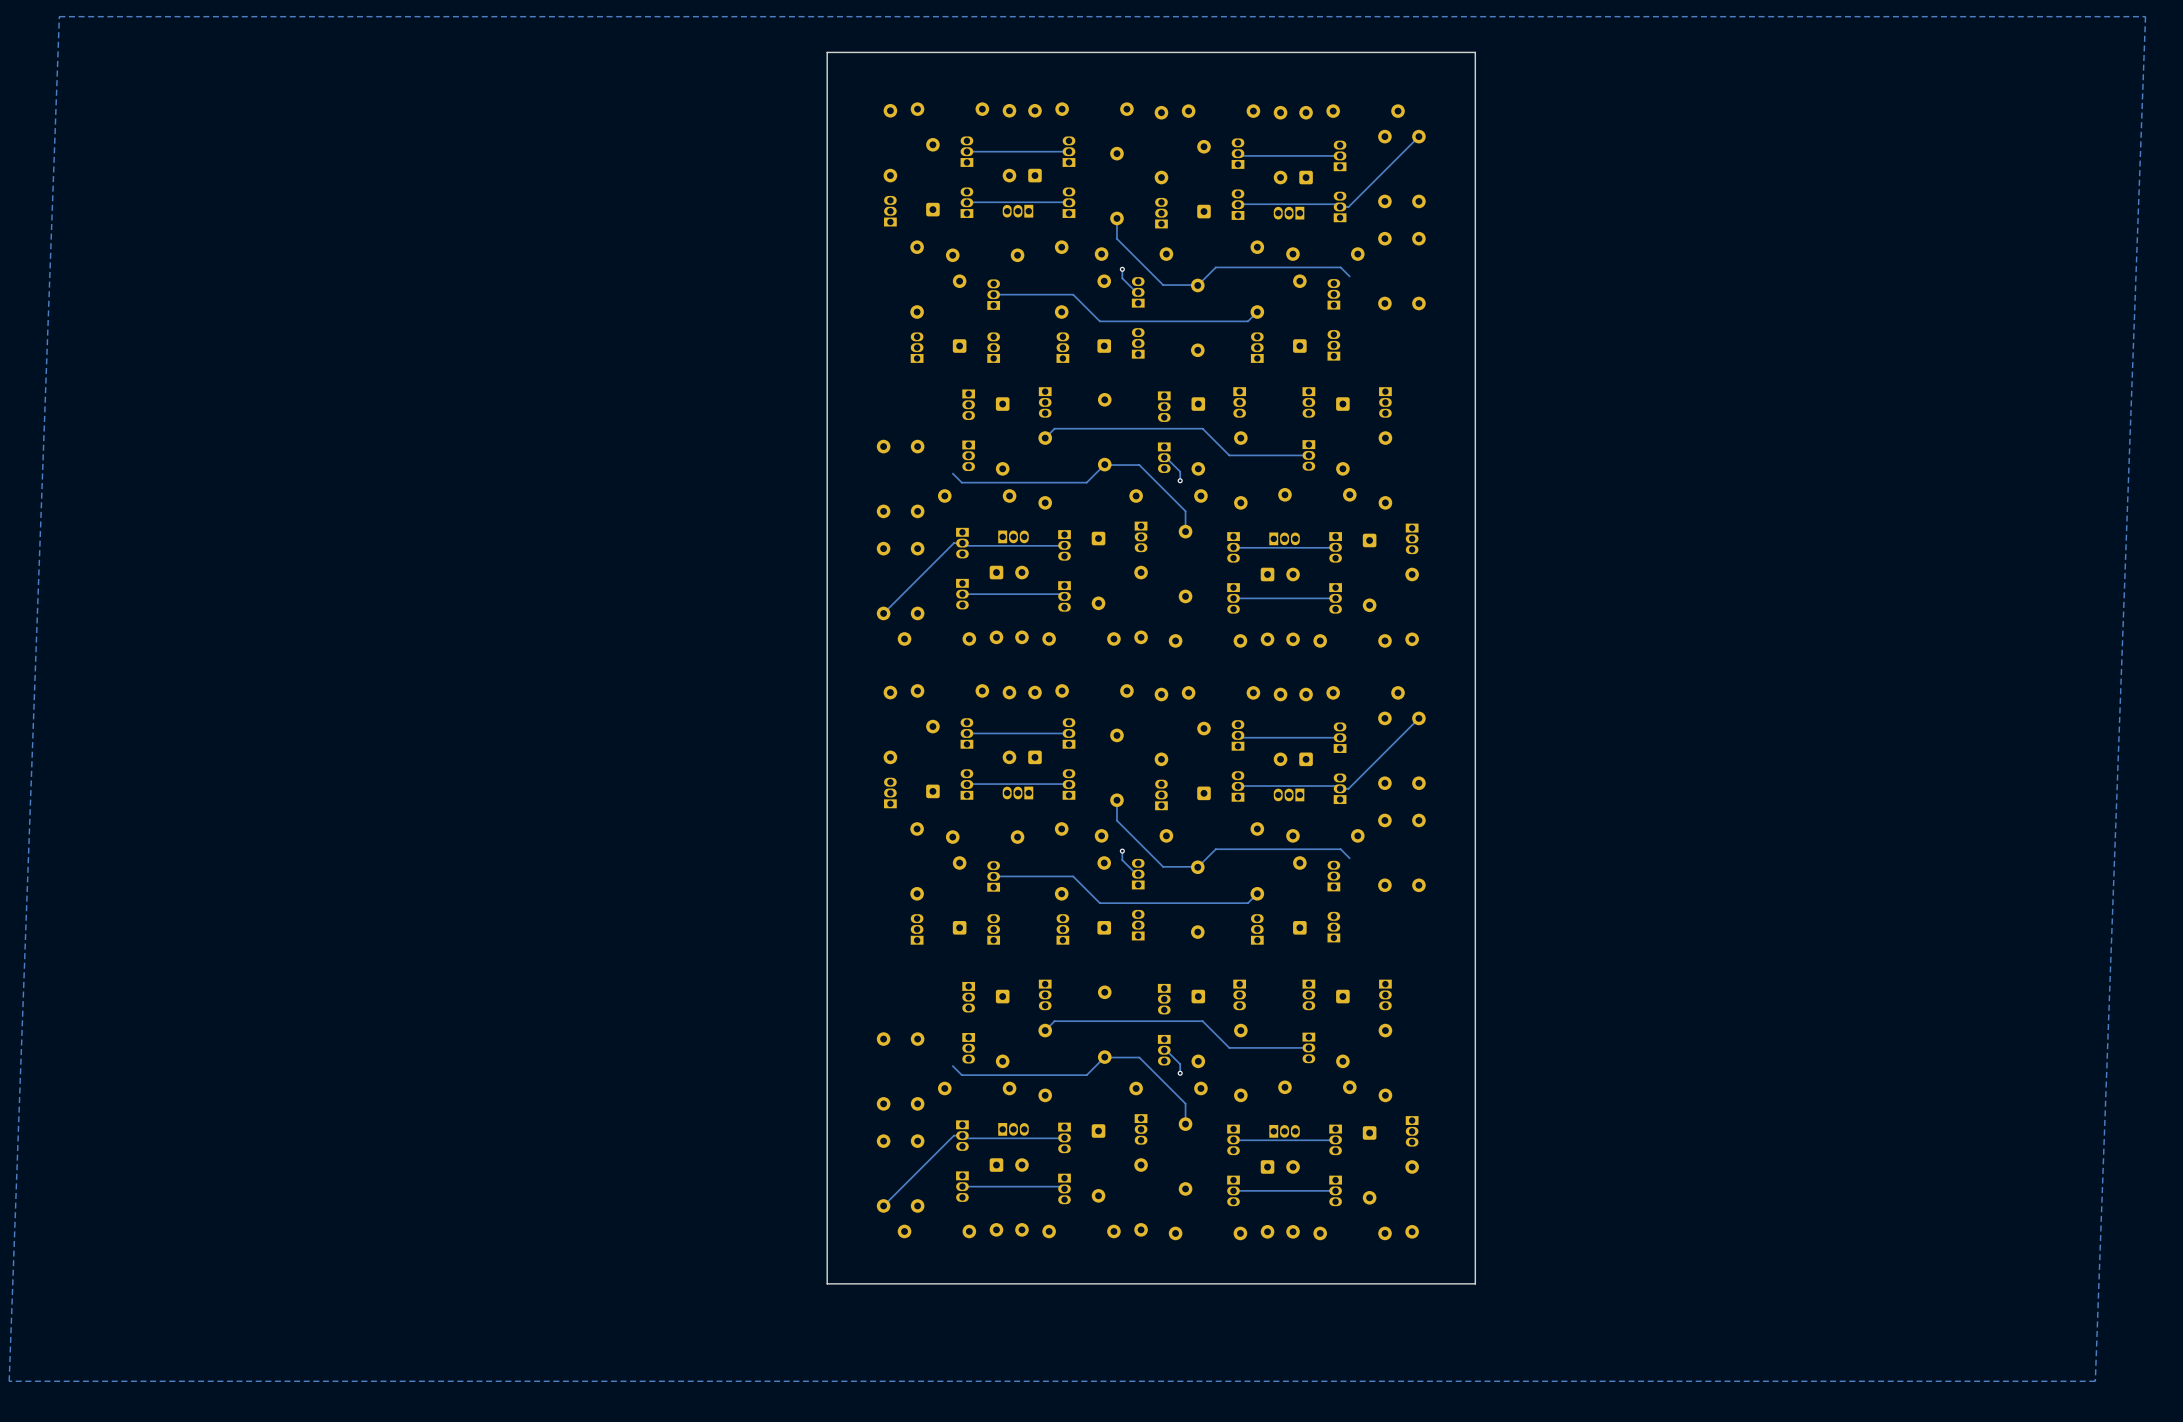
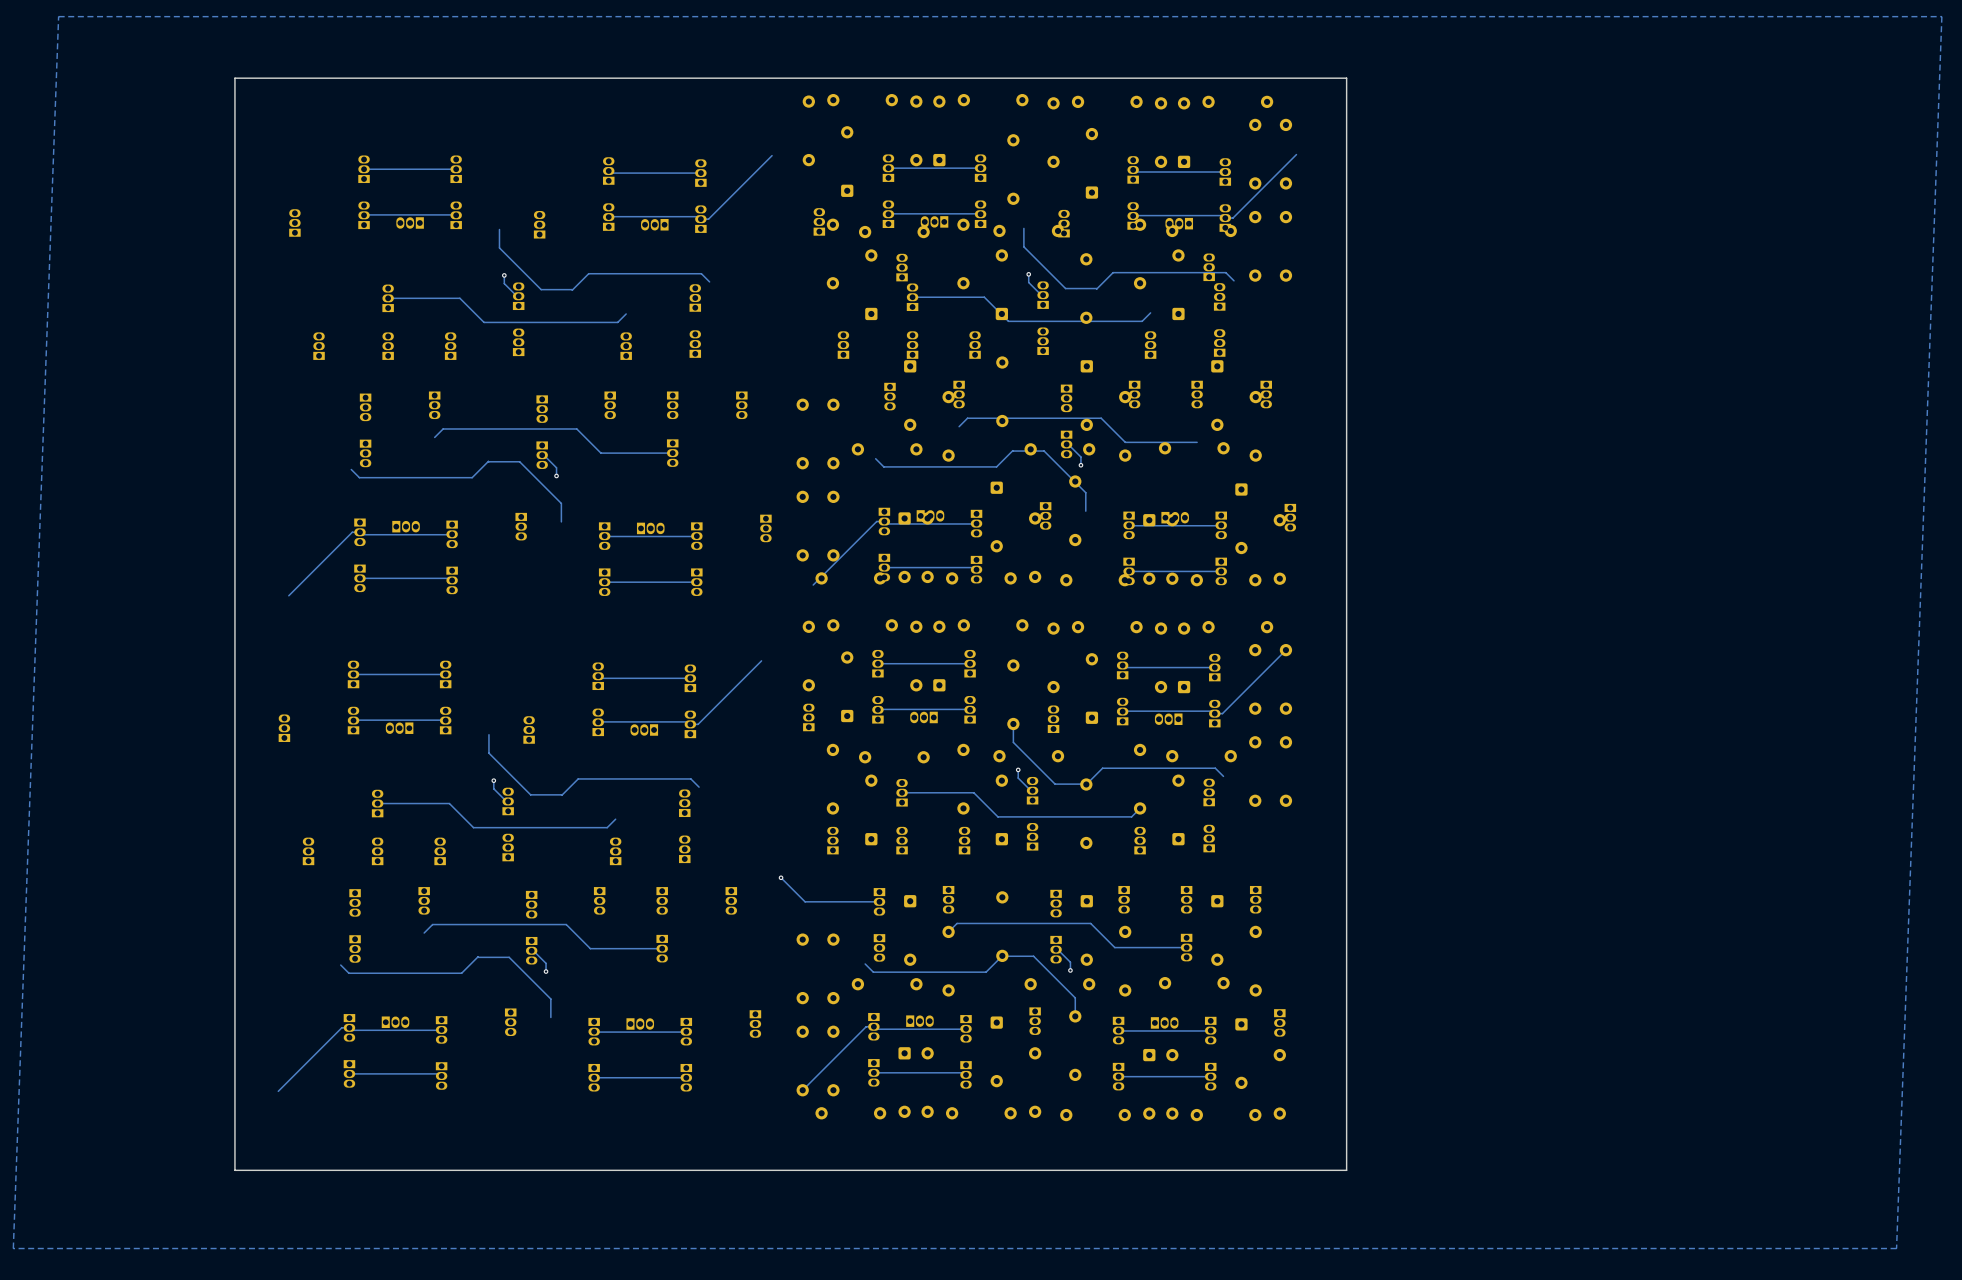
board edge: (1475, 52) (827, 52) (827, 1283) (1475, 1283) (1475, 52) -> (1346, 78) (1346, 1170) (234, 1170) (234, 78) (1346, 78)
track: (1418, 136) (1348, 206) (1340, 206) (1337, 204) (1238, 204) -> (1296, 154) (1232, 218) (1225, 218) (1222, 215) (1133, 215)
part: (966, 151) -> none
track: (1069, 151) (966, 151) -> (980, 168) (888, 168)
part: (1069, 151) -> none
track: (1238, 153) (1240, 155) (1340, 155) -> (1133, 169) (1135, 171) (1225, 171)
part: (1238, 153) -> none
part: (1340, 155) -> none
track: none -> (772, 155) (708, 219) (700, 219) (698, 216) (608, 217)
part: none -> (888, 168)
part: none -> (980, 168)
part: none -> (364, 169)
track: none -> (456, 169) (364, 169)
part: none -> (456, 169)
part: none -> (1133, 169)
track: none -> (608, 171) (610, 173) (700, 173)
part: none -> (608, 171)
part: none -> (1225, 171)
part: none -> (700, 173)
part: (966, 202) -> none
track: (1069, 202) (966, 202) -> (980, 214) (888, 214)
part: (1069, 202) -> none
part: (1238, 204) -> none
part: (1340, 206) -> none
part position: (890, 211) -> (819, 221)
part: (1017, 211) -> none
part: (1161, 213) -> none
part: (1289, 213) -> none
track: (1116, 218) (1116, 238) (1163, 285) (1197, 285) (1215, 267) (1340, 267) (1349, 276) -> (1023, 228) (1023, 246) (1065, 288) (1096, 288) (1113, 272) (1225, 272) (1234, 280)
part: none -> (888, 214)
part: none -> (980, 214)
part: none -> (364, 215)
track: none -> (456, 215) (364, 215)
part: none -> (456, 215)
part: none -> (1133, 215)
part: none -> (608, 217)
part: none -> (1225, 218)
part: none -> (700, 219)
part: none -> (934, 221)
part: none -> (294, 222)
part: none -> (410, 222)
part: none -> (1064, 223)
part: none -> (1179, 223)
part: none -> (539, 224)
part: none -> (654, 224)
track: none -> (499, 229) (499, 247) (541, 289) (572, 290) (588, 273) (701, 273) (709, 281)
track: (1122, 269) (1122, 278) (1138, 292) -> (1028, 274) (1028, 282) (1043, 295)
via position: (1122, 269) -> (1028, 274)
part: (1138, 292) -> none
track: (993, 294) (1073, 294) (1099, 321) (1247, 321) (1257, 312) -> (912, 297) (984, 297) (1008, 321) (1142, 321) (1150, 312)
track: none -> (504, 275) (504, 283) (518, 296)
via: none -> (504, 275)
part: none -> (1043, 295)
part: none -> (518, 296)
part: none -> (912, 297)
part: none -> (1219, 296)
track: none -> (388, 298) (459, 298) (484, 322) (617, 322) (626, 313)
part: none -> (388, 298)
part: none -> (695, 298)
part: (1138, 343) -> none
part: (1333, 345) -> none
part: (917, 347) -> none
part: (993, 347) -> none
part: (1062, 347) -> none
part: (1257, 347) -> none
part: none -> (1043, 341)
part: none -> (518, 342)
part: none -> (1219, 342)
part: none -> (695, 344)
part: none -> (843, 345)
part: none -> (912, 345)
part: none -> (975, 345)
part: none -> (1150, 345)
part: none -> (319, 346)
part: none -> (388, 346)
part: none -> (450, 346)
part: none -> (626, 346)
part: (1045, 402) -> none
part: (1239, 402) -> none
part: (1308, 402) -> none
part: (1385, 402) -> none
part: (968, 404) -> none
part: (1164, 406) -> none
part: none -> (959, 394)
part: none -> (1134, 394)
part: none -> (1197, 394)
part: none -> (1266, 394)
part: none -> (890, 396)
track: (1045, 438) (1054, 428) (1202, 428) (1229, 455) (1308, 455) -> (959, 426) (967, 418) (1101, 418) (1125, 442) (1197, 442)
part: none -> (1066, 398)
part: none -> (434, 405)
part: none -> (610, 405)
part: none -> (672, 405)
part: none -> (741, 405)
part: none -> (365, 407)
part: none -> (542, 409)
part: (968, 455) -> none
part: (1308, 455) -> none
track: (1164, 457) (1180, 471) (1180, 480) -> (1066, 444) (1080, 457) (1080, 465)
part: (1164, 457) -> none
track: (952, 473) (961, 482) (1086, 482) (1104, 464) (1139, 465) (1185, 511) (1185, 531) -> (875, 458) (883, 466) (996, 466) (1012, 450) (1044, 451) (1085, 492) (1085, 511)
via position: (1180, 480) -> (1080, 465)
track: none -> (434, 437) (443, 428) (576, 428) (600, 453) (672, 453)
part: none -> (1066, 444)
part: none -> (365, 453)
part: none -> (672, 453)
track: none -> (542, 455) (556, 467) (556, 475)
part: none -> (542, 455)
track: none -> (351, 469) (359, 477) (472, 477) (488, 461) (519, 461) (561, 503) (561, 521)
via: none -> (556, 475)
part: (1013, 536) -> none
part: (1141, 536) -> none
part: (1284, 538) -> none
part position: (1412, 538) -> (1290, 517)
part: (962, 543) -> none
track: (1064, 545) (965, 545) (962, 543) (953, 543) (883, 613) -> (976, 523) (886, 523) (884, 521) (876, 521) (813, 585)
part: (1064, 545) -> none
part: (1233, 547) -> none
track: (1335, 547) (1233, 547) -> (1221, 525) (1129, 525)
part: (1335, 547) -> none
part: none -> (930, 515)
part: none -> (1045, 515)
part: none -> (1175, 517)
part: none -> (884, 521)
part: none -> (976, 523)
part: none -> (1129, 525)
part: none -> (1221, 525)
part: none -> (406, 526)
part: none -> (521, 526)
part: none -> (650, 528)
part: none -> (765, 528)
part: none -> (359, 532)
track: none -> (452, 534) (362, 534) (359, 532) (352, 532) (288, 595)
part: none -> (452, 534)
part: none -> (604, 536)
track: none -> (696, 536) (604, 536)
part: none -> (696, 536)
track: (962, 594) (1062, 594) (1064, 596) -> (884, 567) (974, 567) (976, 569)
part: (962, 594) -> none
part: (1064, 596) -> none
part: (1233, 598) -> none
track: (1335, 598) (1233, 598) -> (1221, 571) (1129, 571)
part: (1335, 598) -> none
part: none -> (884, 567)
part: none -> (976, 569)
part: none -> (1129, 571)
part: none -> (1221, 571)
track: none -> (359, 578) (450, 578) (452, 580)
part: none -> (359, 578)
part: none -> (452, 580)
part: none -> (604, 582)
track: none -> (696, 582) (604, 582)
part: none -> (696, 582)
track: none -> (761, 660) (698, 724) (690, 724) (687, 721) (598, 722)
part: none -> (353, 674)
track: none -> (445, 674) (353, 674)
part: none -> (445, 674)
track: none -> (598, 676) (600, 678) (690, 678)
part: none -> (598, 676)
part: none -> (690, 678)
part: none -> (353, 720)
track: none -> (445, 720) (353, 720)
part: none -> (445, 720)
part: none -> (598, 722)
part: none -> (690, 724)
part: none -> (284, 728)
part: none -> (399, 728)
part: none -> (529, 729)
part: none -> (644, 729)
track: none -> (488, 734) (488, 753) (530, 794) (561, 795) (578, 778) (690, 778) (699, 787)
track: none -> (493, 780) (493, 788) (508, 801)
via: none -> (493, 780)
part: none -> (508, 801)
track: none -> (377, 803) (449, 803) (473, 827) (607, 827) (615, 819)
part: none -> (377, 803)
part: none -> (684, 803)
part: none -> (508, 847)
part: none -> (684, 849)
part: none -> (308, 851)
part: none -> (377, 851)
part: none -> (440, 851)
part: none -> (615, 851)
track: none -> (781, 877) (805, 901) (879, 901)
via: none -> (781, 877)
part: none -> (424, 900)
part: none -> (599, 900)
part: none -> (662, 900)
part: none -> (731, 900)
part: none -> (355, 902)
part: none -> (531, 904)
track: none -> (424, 933) (432, 924) (566, 924) (590, 948) (662, 948)
part: none -> (355, 948)
part: none -> (662, 948)
track: none -> (531, 950) (546, 963) (546, 971)
part: none -> (531, 950)
track: none -> (340, 965) (348, 973) (461, 973) (477, 956) (509, 957) (550, 999) (550, 1017)
via: none -> (546, 971)
part: none -> (395, 1022)
part: none -> (510, 1022)
part: none -> (640, 1024)
part: none -> (755, 1024)
part: none -> (349, 1027)
track: none -> (441, 1029) (351, 1030) (349, 1027) (341, 1027) (278, 1091)
part: none -> (441, 1029)
part: none -> (594, 1031)
track: none -> (686, 1031) (594, 1031)
part: none -> (686, 1031)
track: none -> (349, 1073) (439, 1073) (441, 1075)
part: none -> (349, 1073)
part: none -> (441, 1075)
part: none -> (594, 1077)
track: none -> (686, 1077) (594, 1077)
part: none -> (686, 1077)

